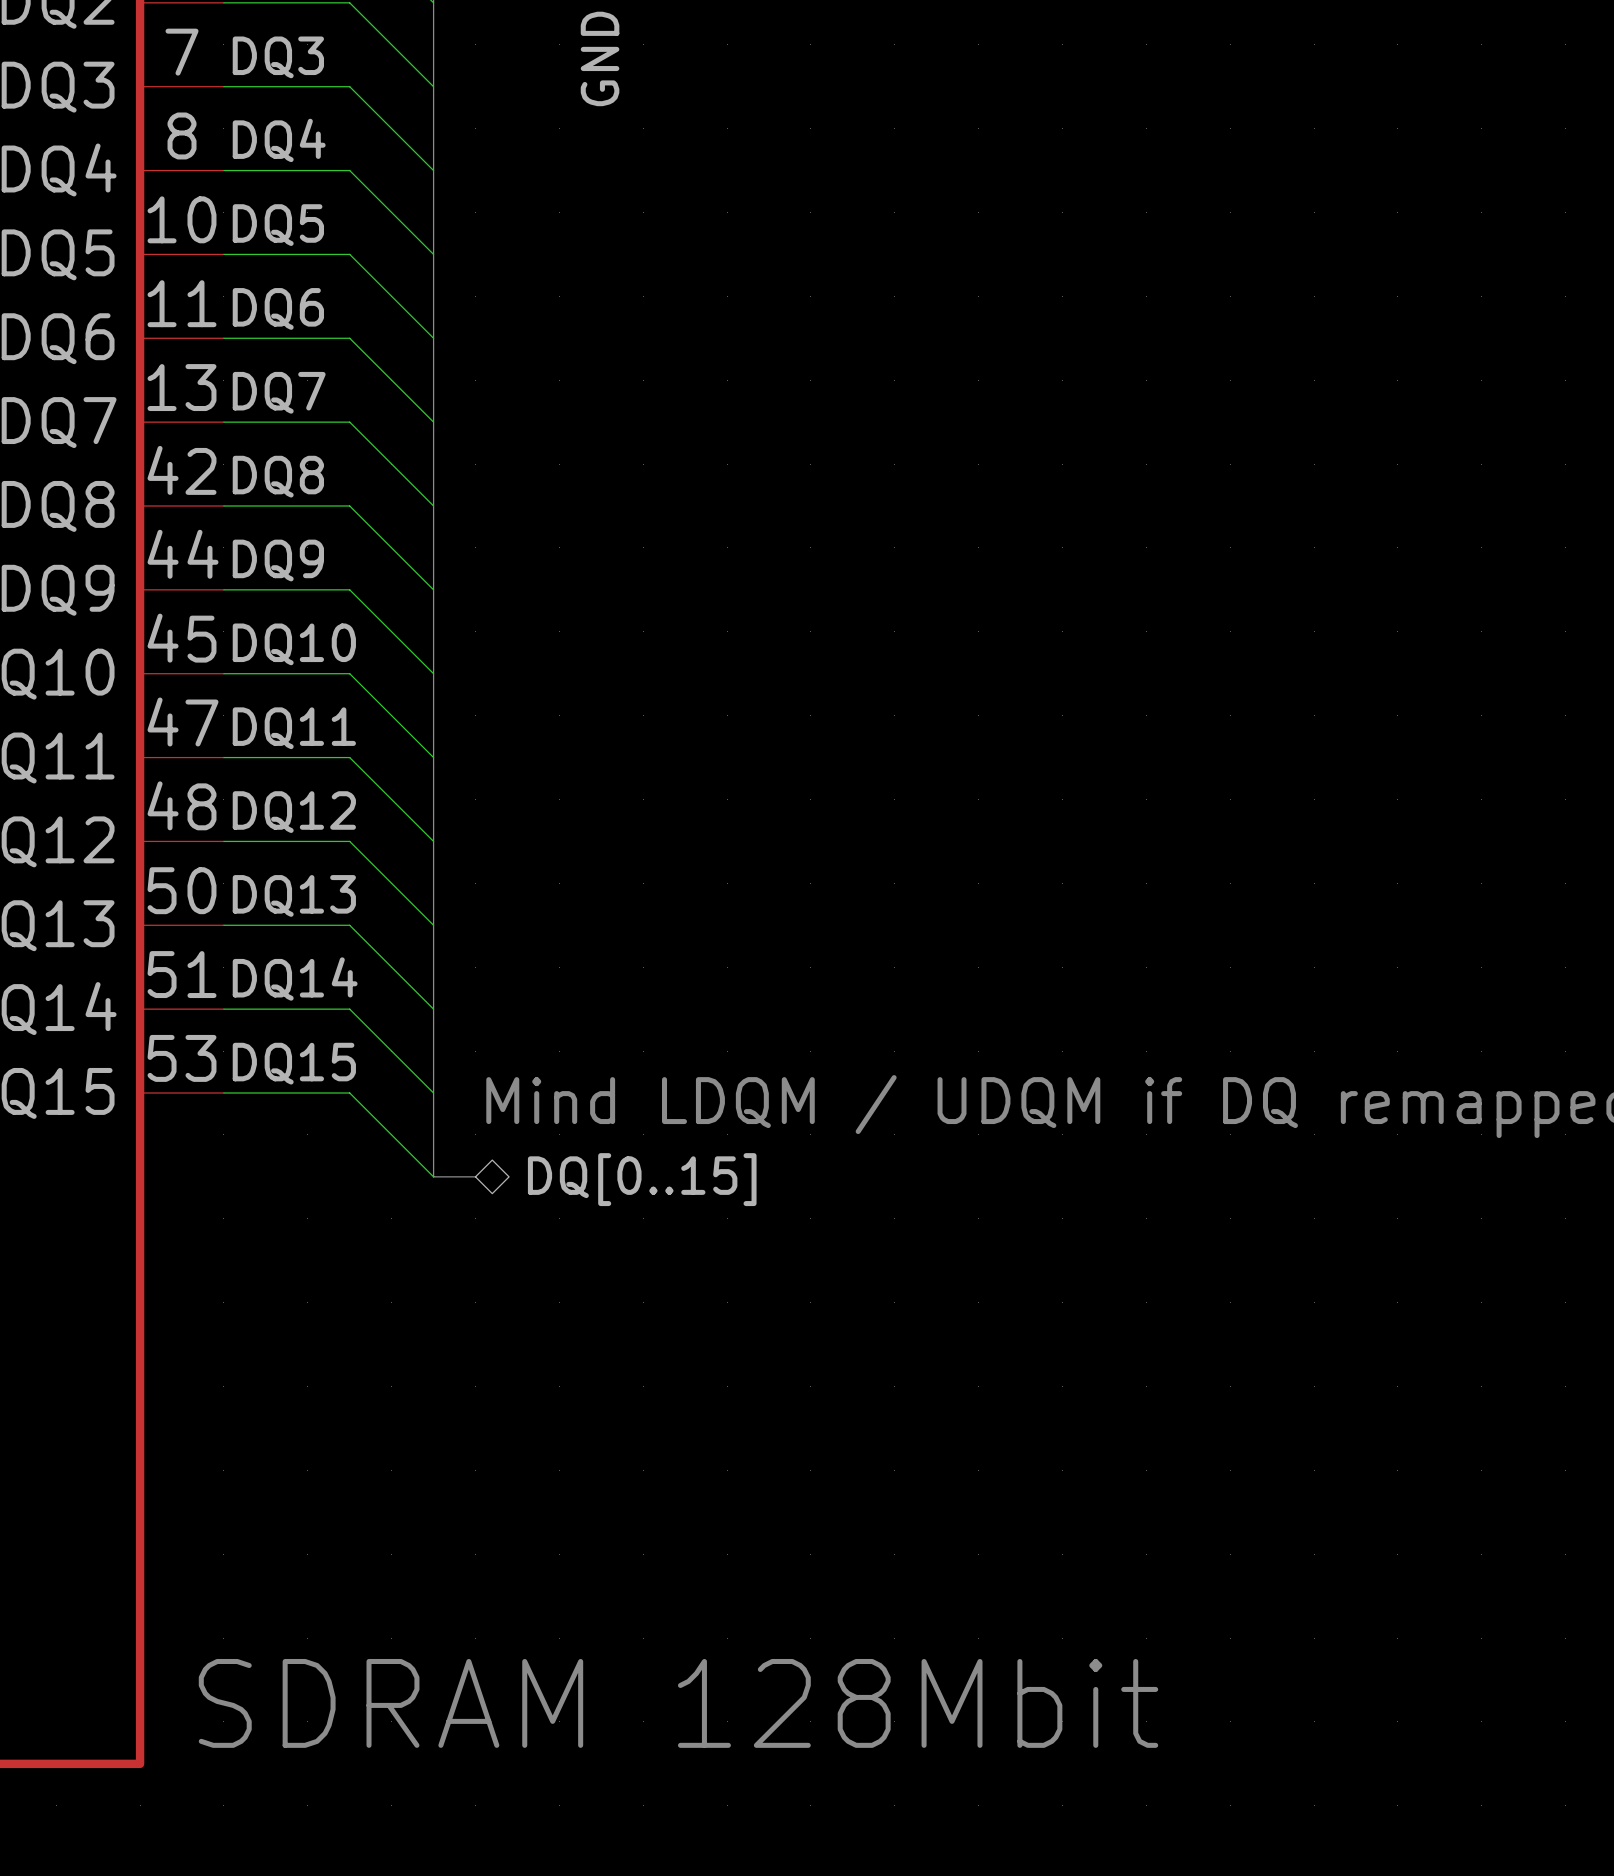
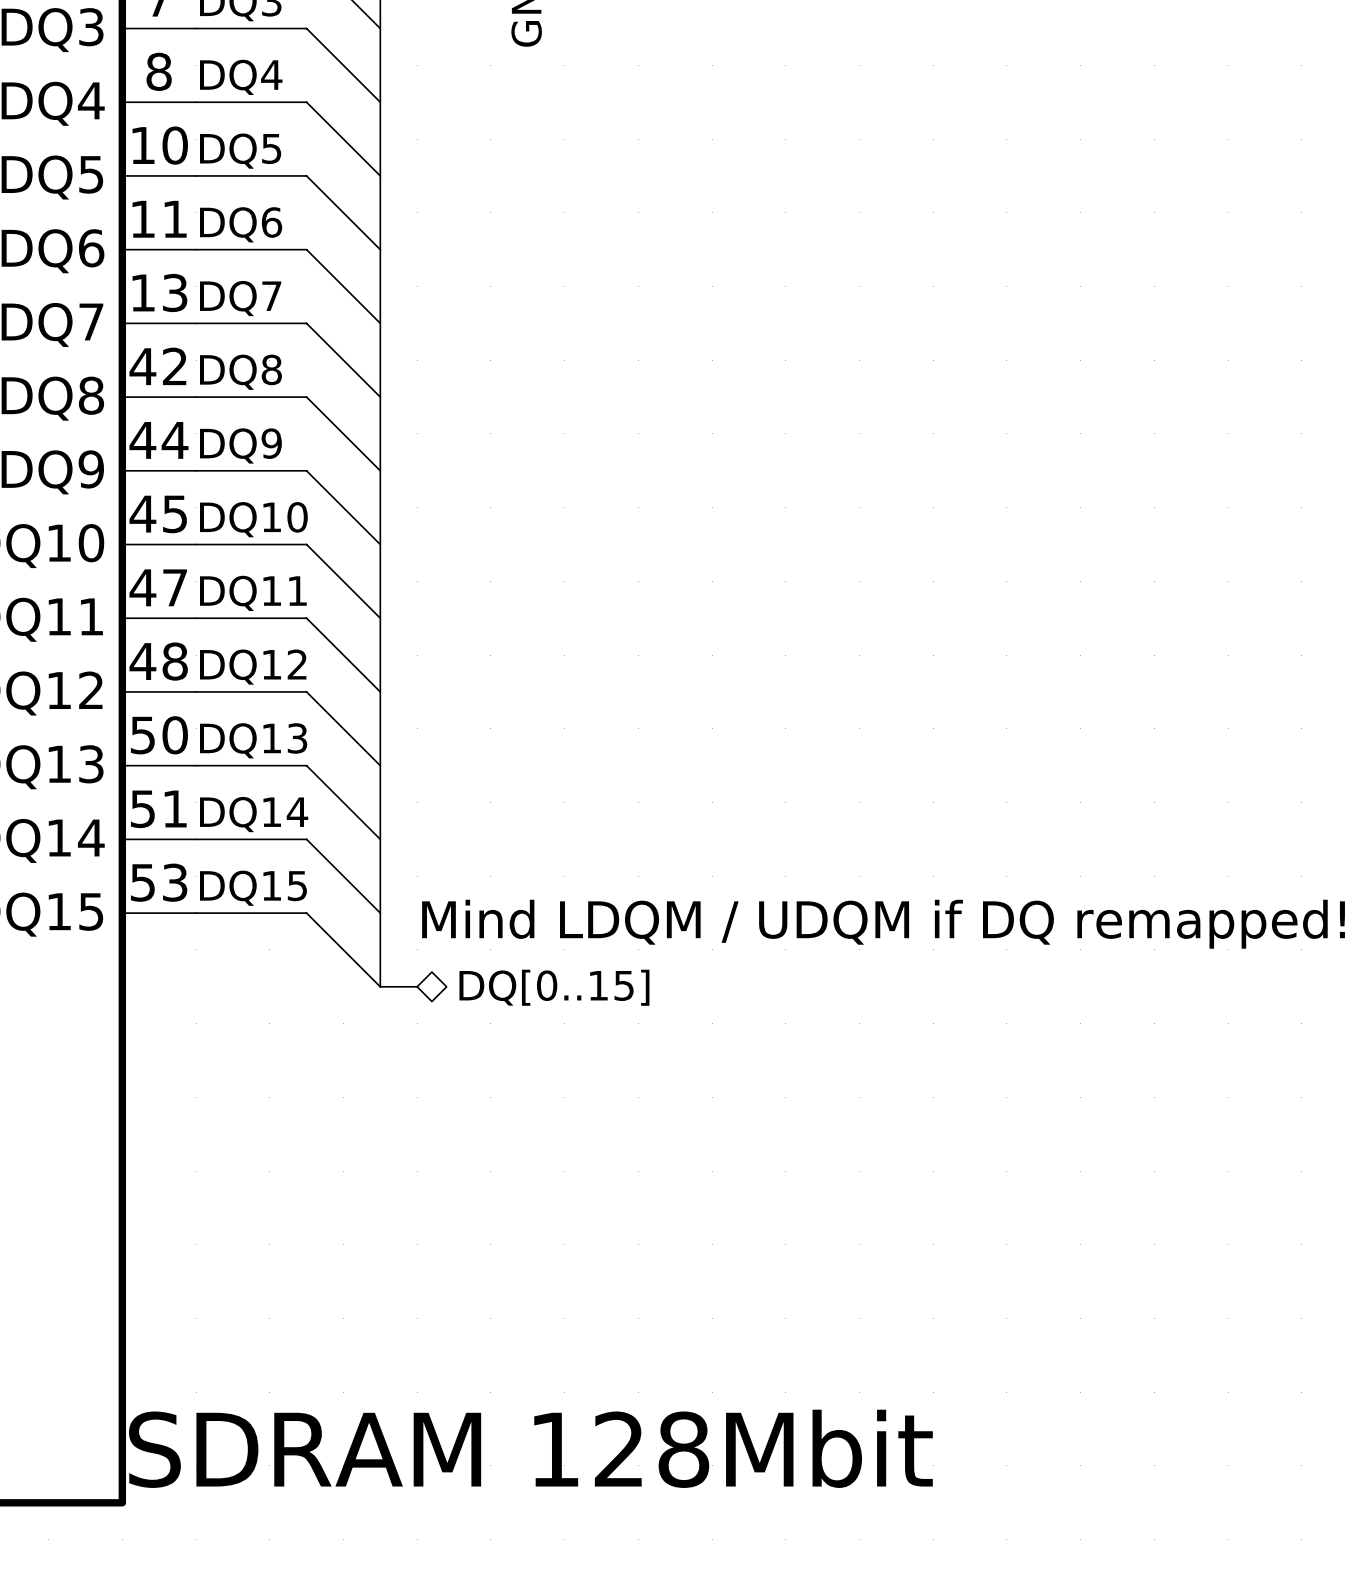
text position: SDRAM 128Mbit (678, 1703) -> SDRAM 128Mbit (530, 1448)

